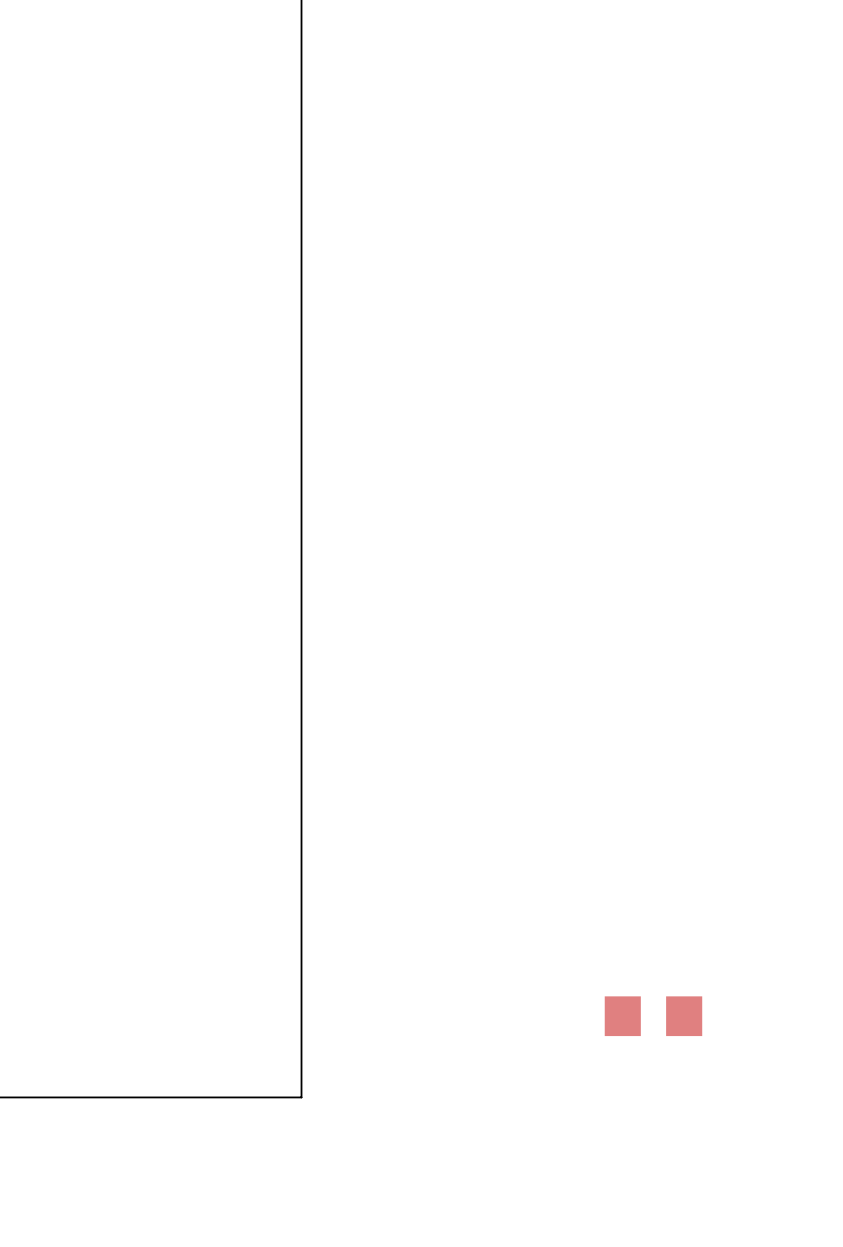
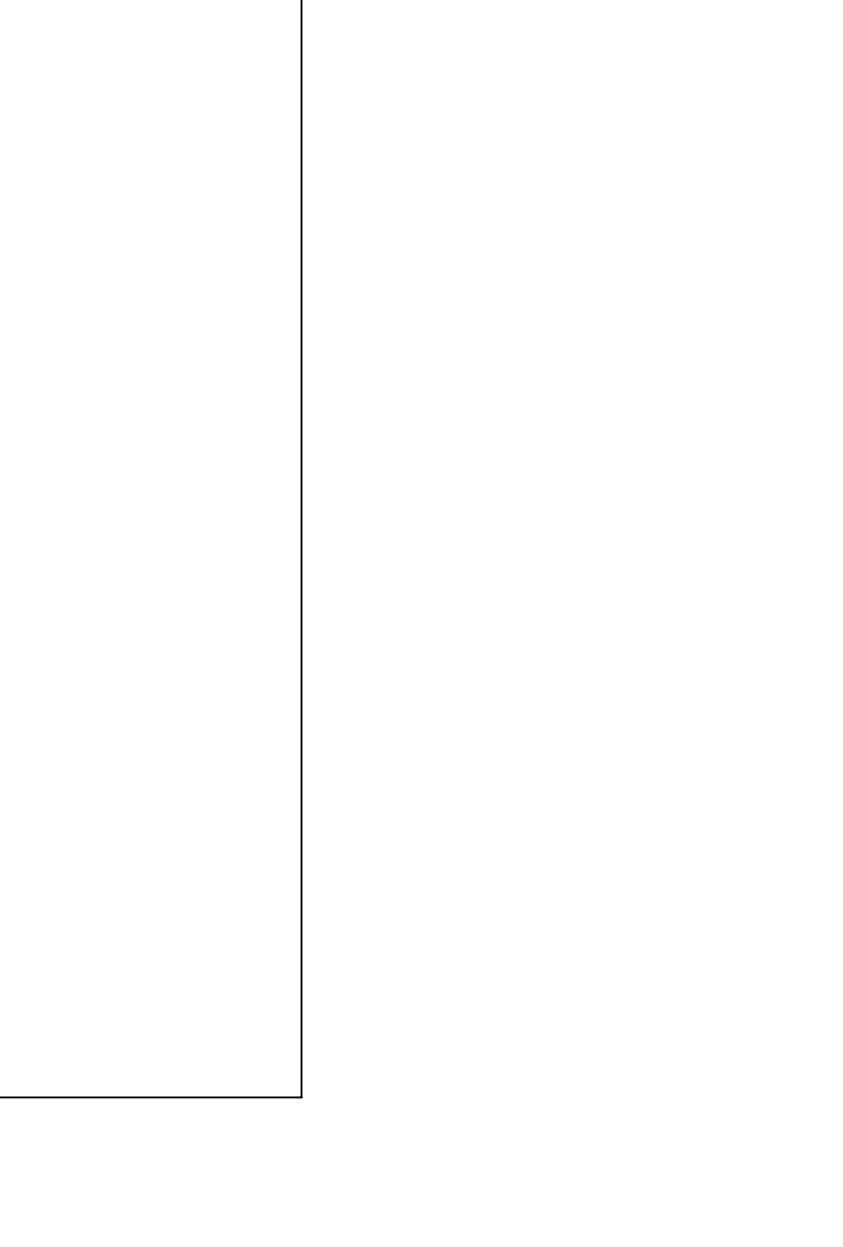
part: (653, 1016) -> none

